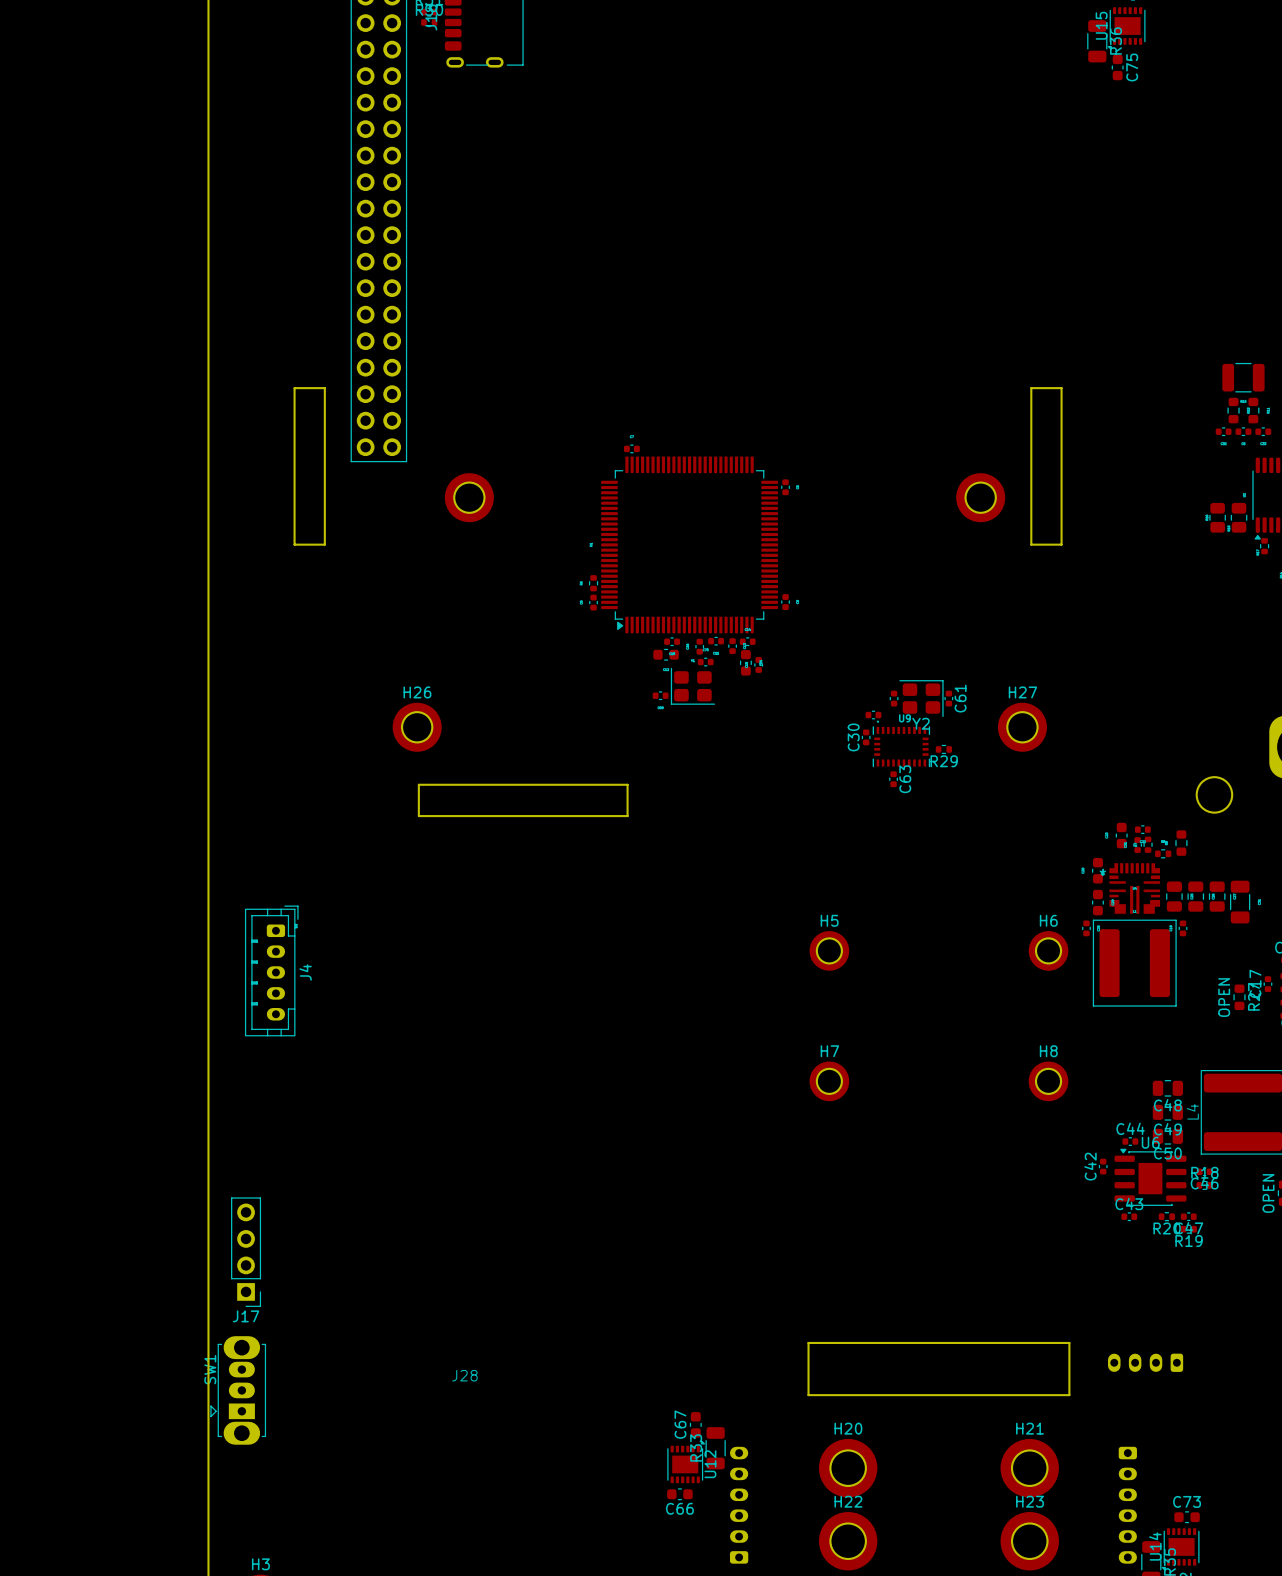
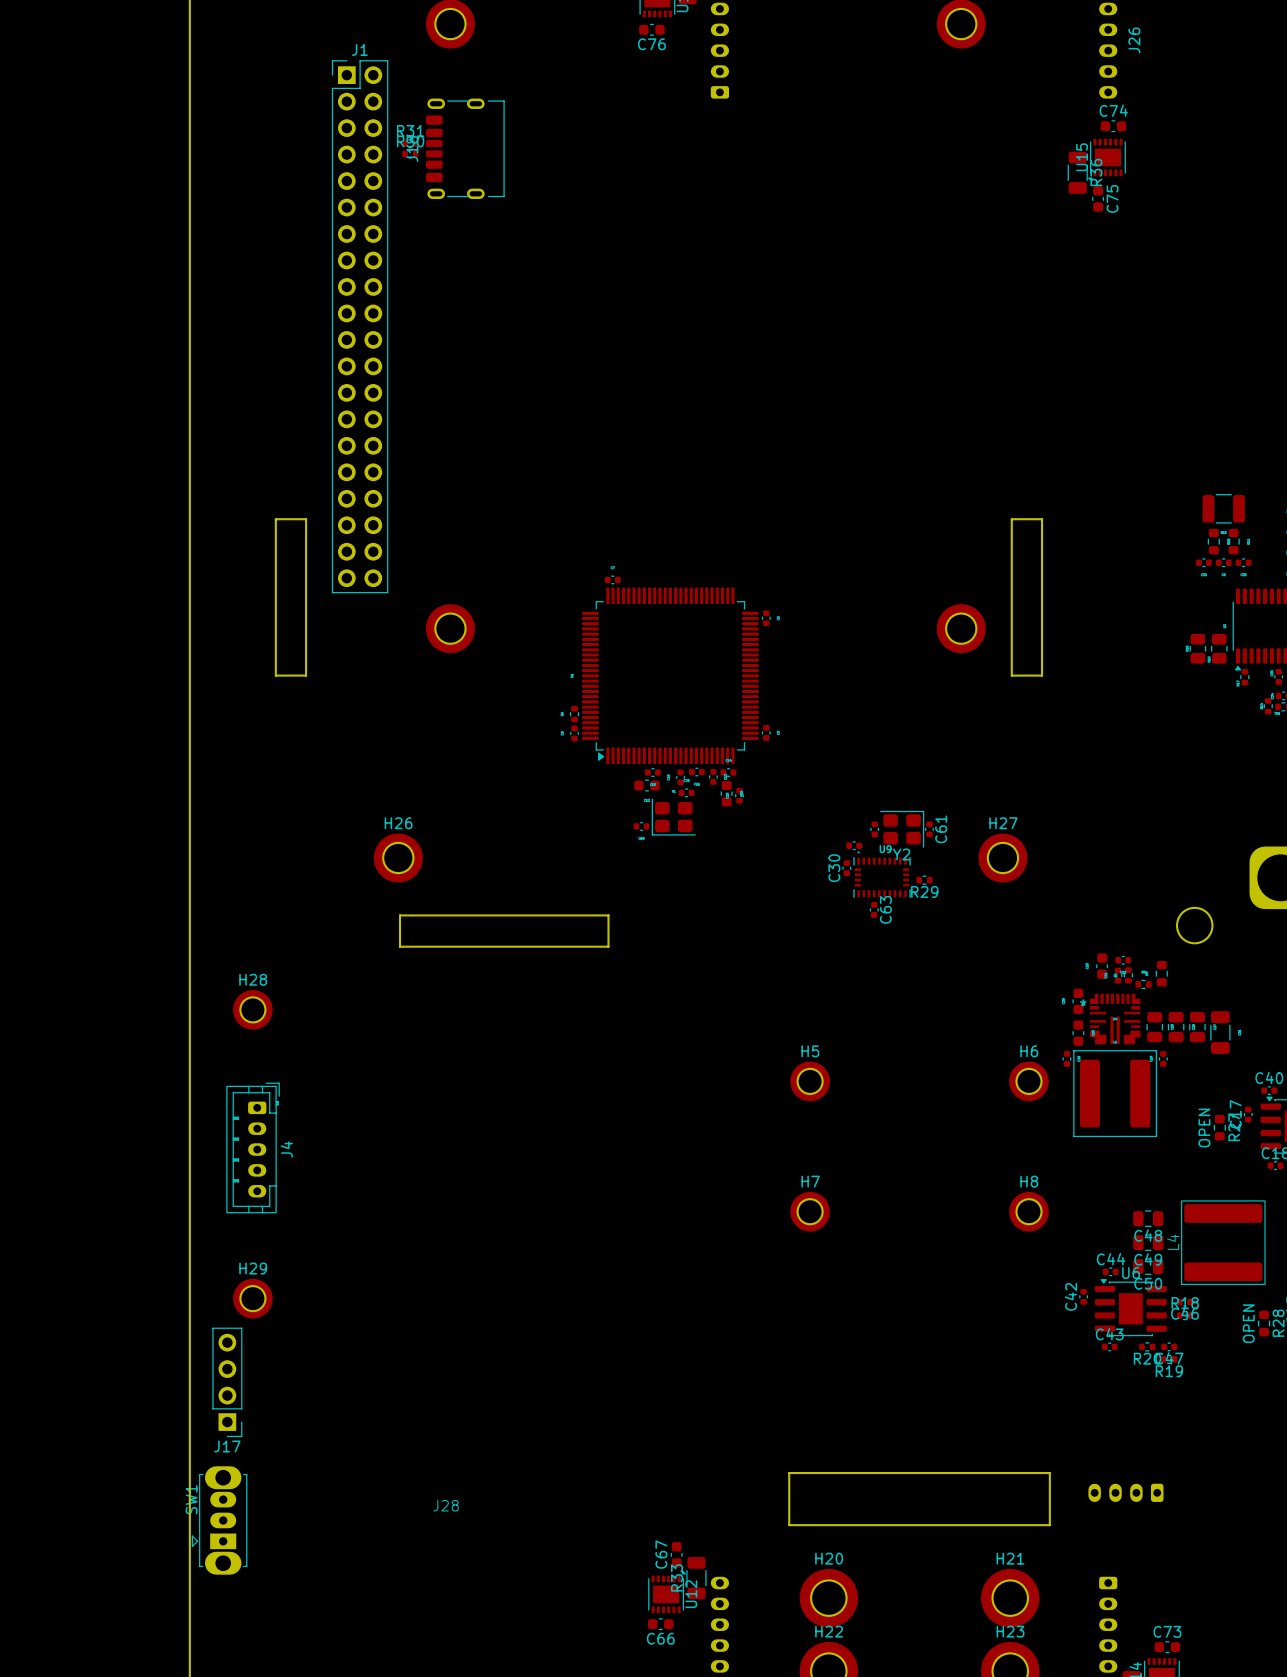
H28: none -> (252, 1009)
J4 position: (271, 970) -> (253, 1147)
H29: none -> (252, 1298)

